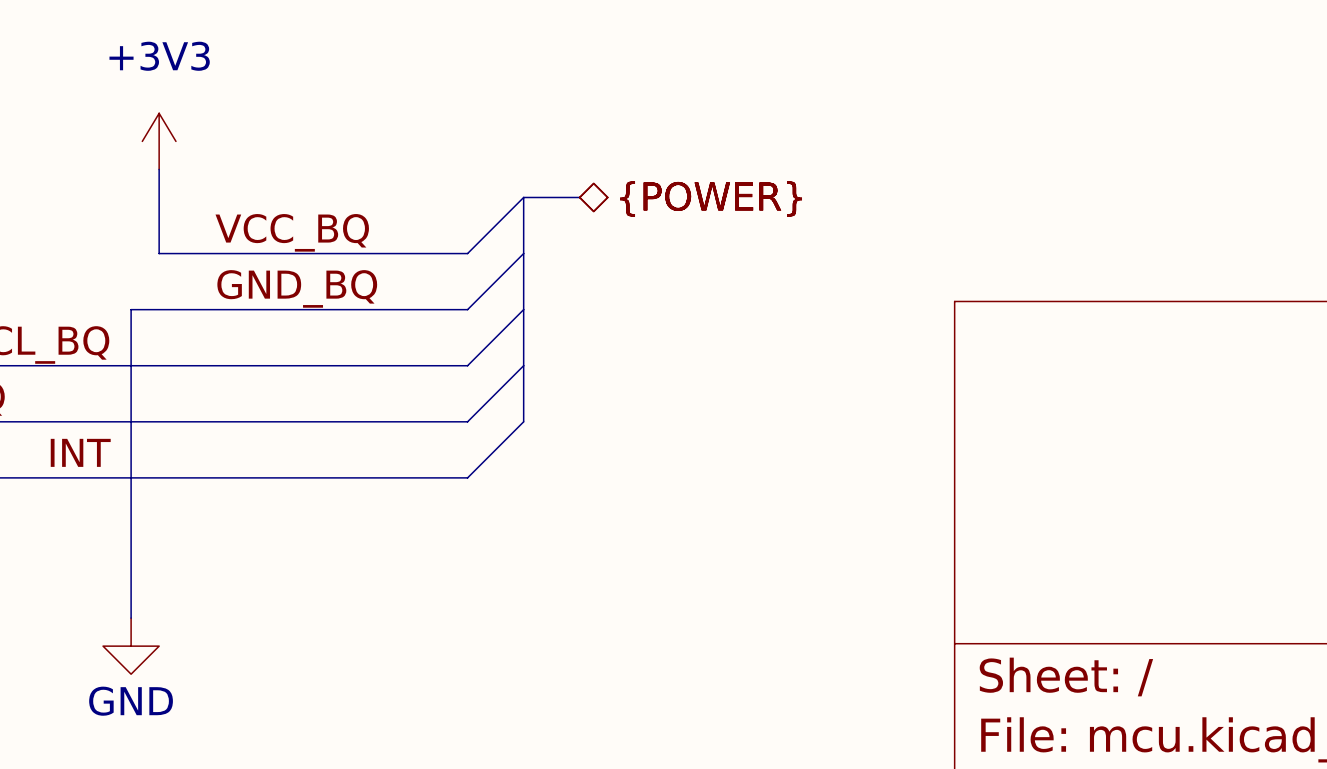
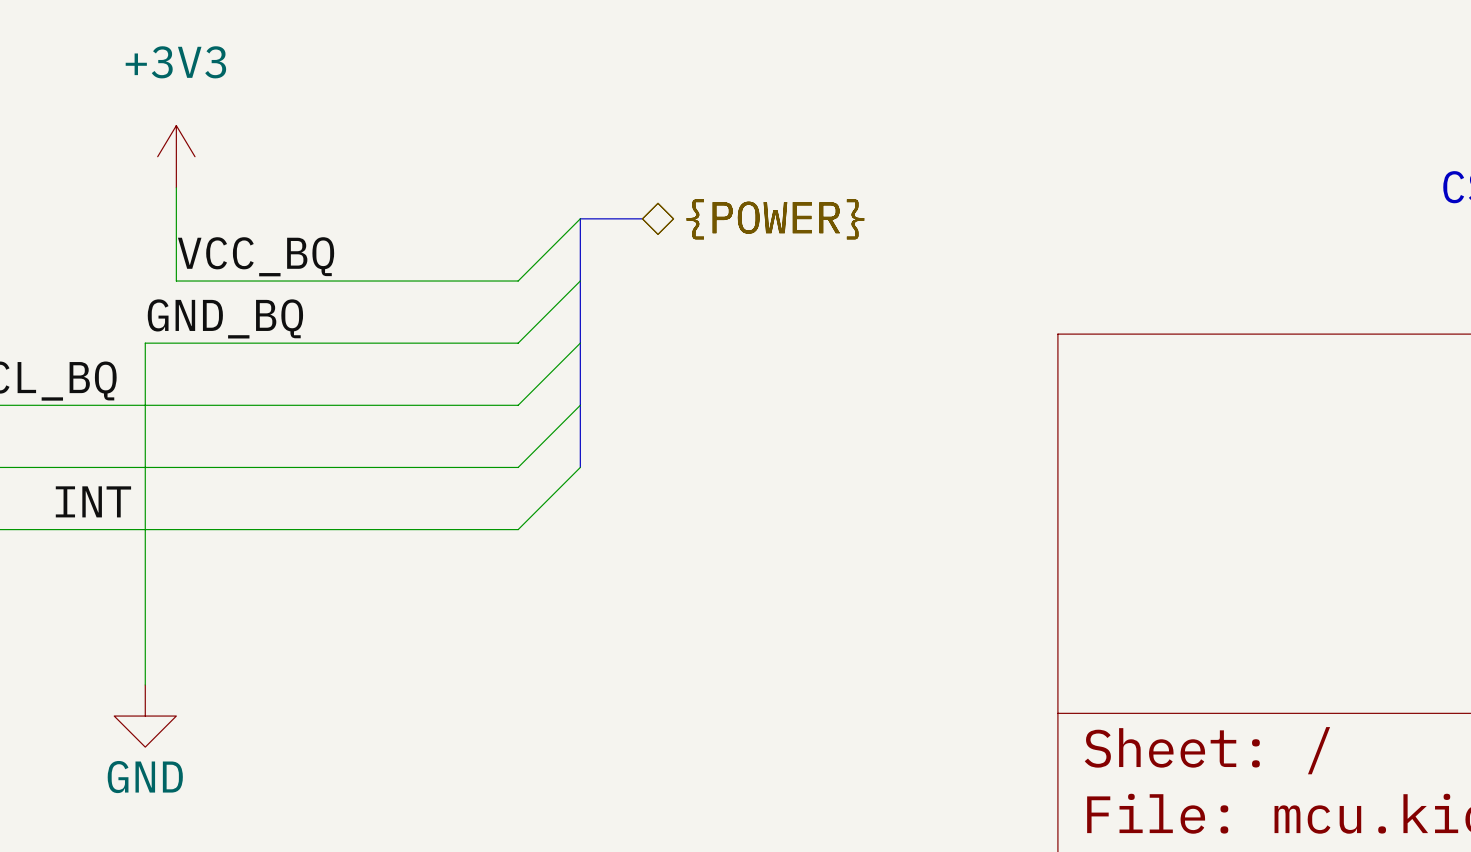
label position: VCC_BQ (292, 232) -> VCC_BQ (256, 256)
label position: GND_BQ (297, 288) -> GND_BQ (225, 318)

